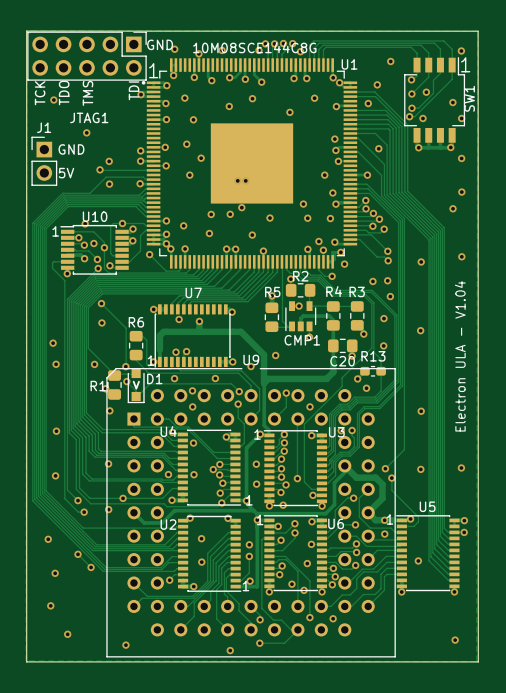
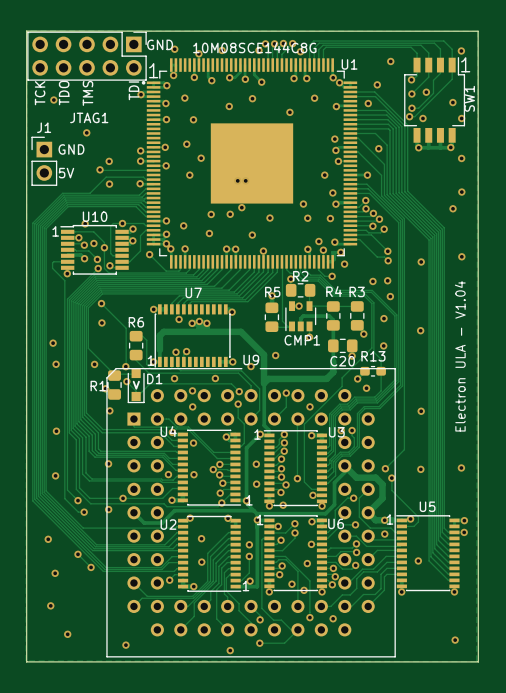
via: none -> (192, 323)
via: none -> (206, 323)

